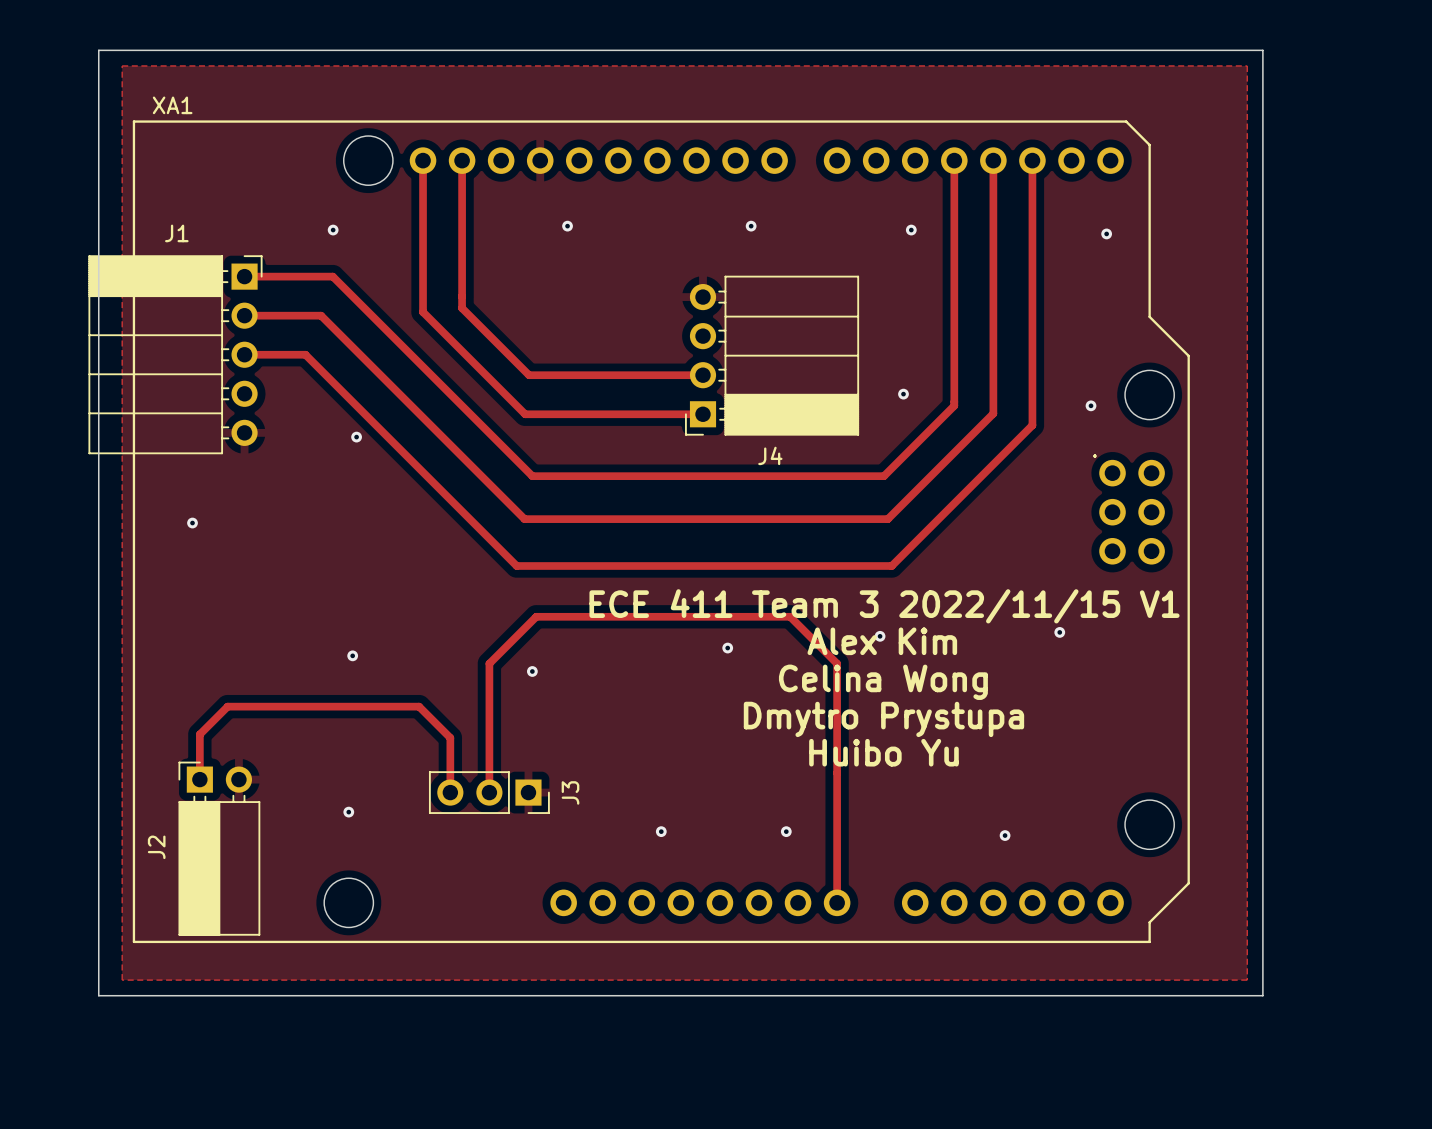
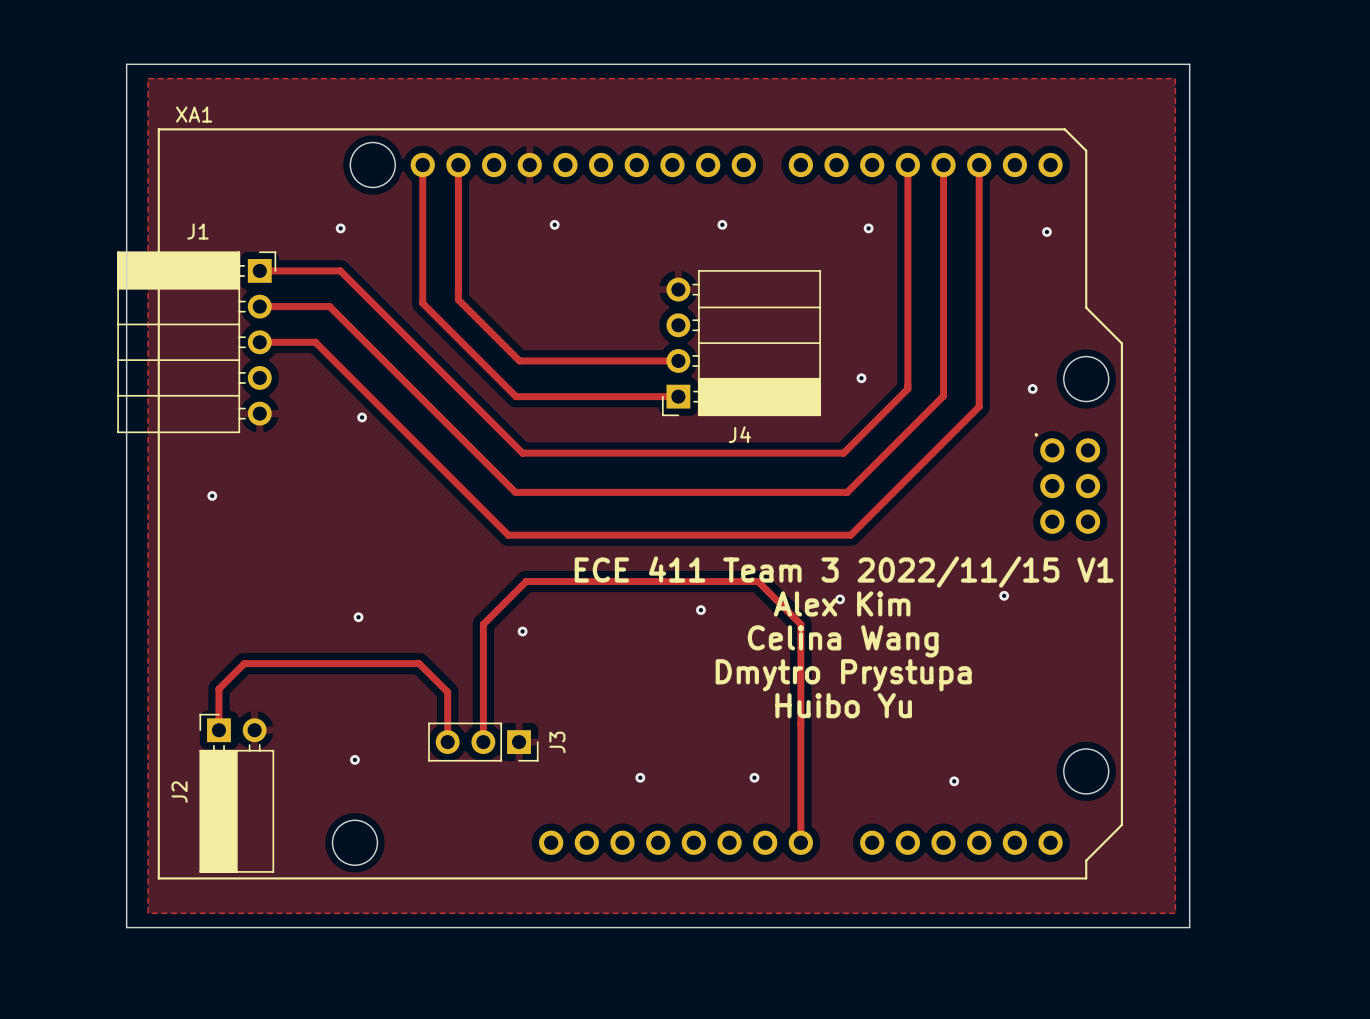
text: Celina Wong (883, 682) -> Celina Wang (843, 641)

